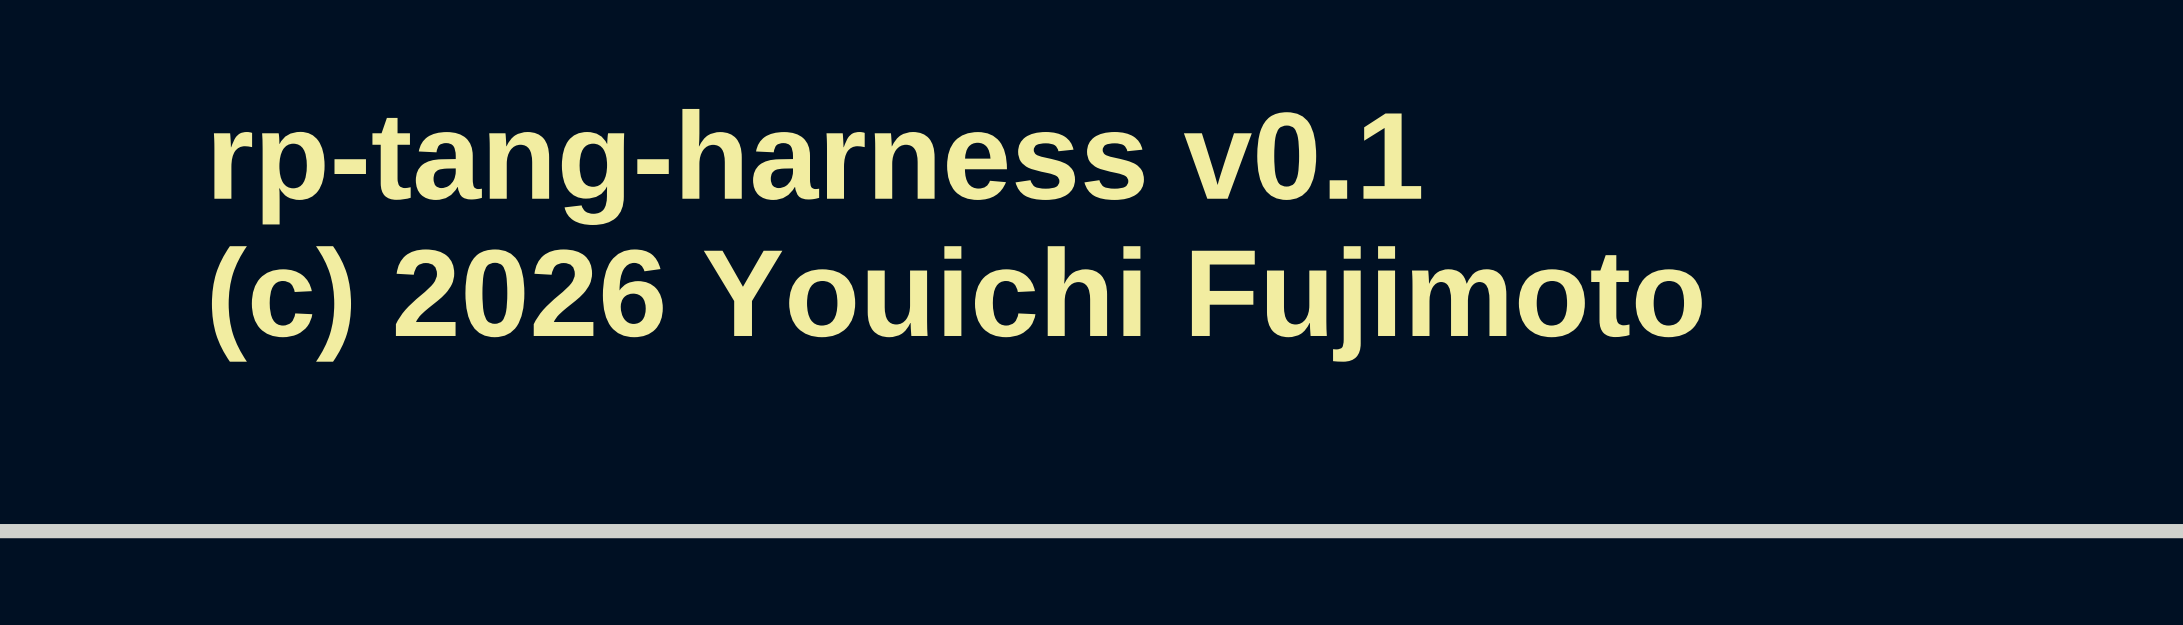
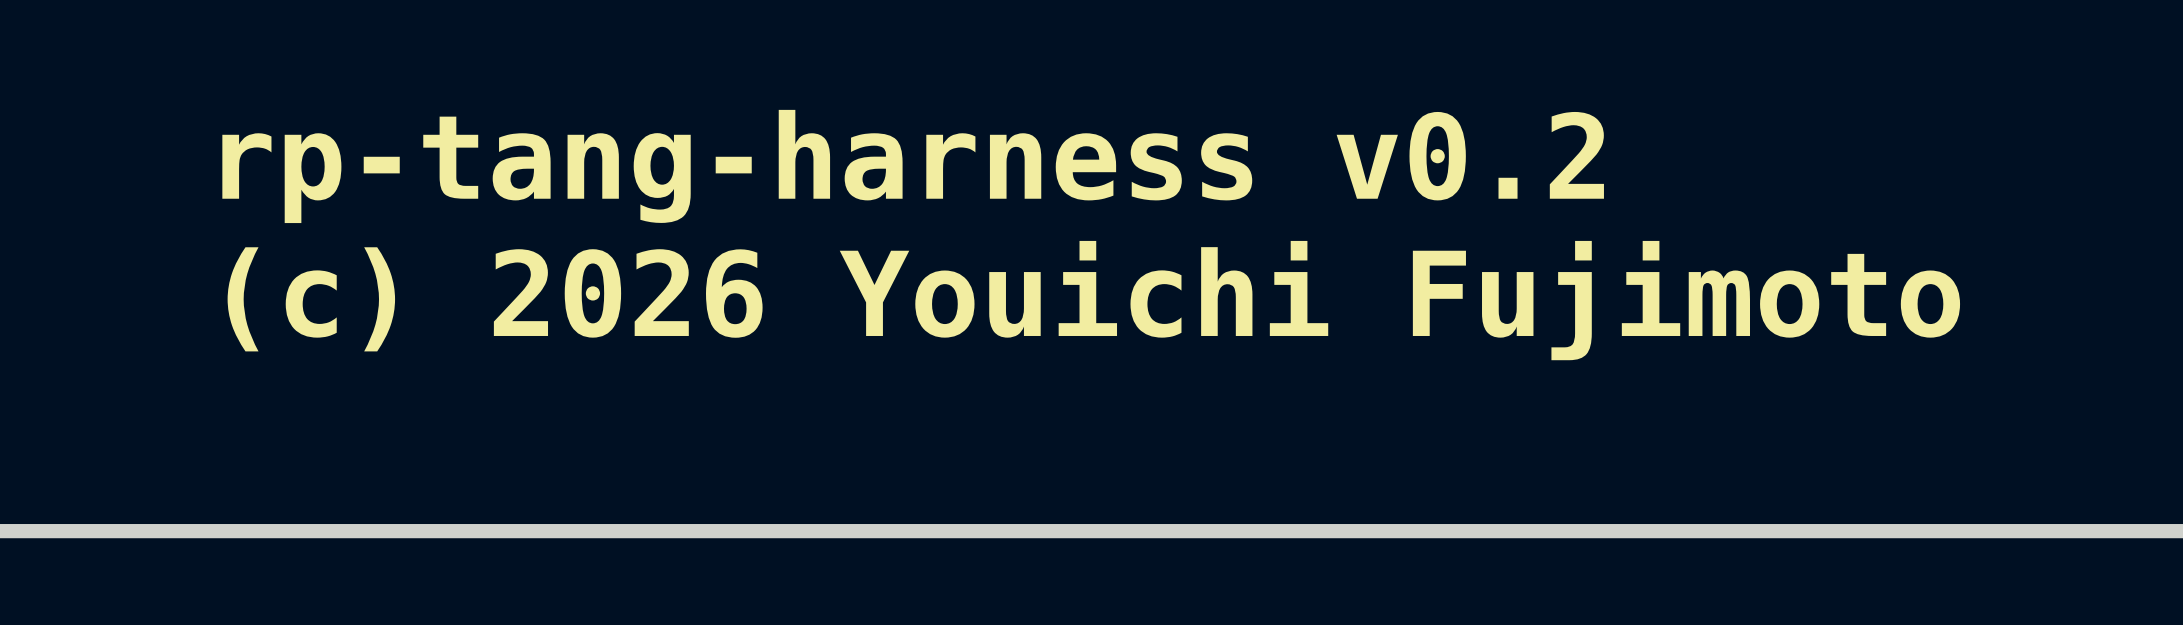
text: rp-tang-harness v0.1 (817, 166) -> rp-tang-harness v0.2 (913, 166)

